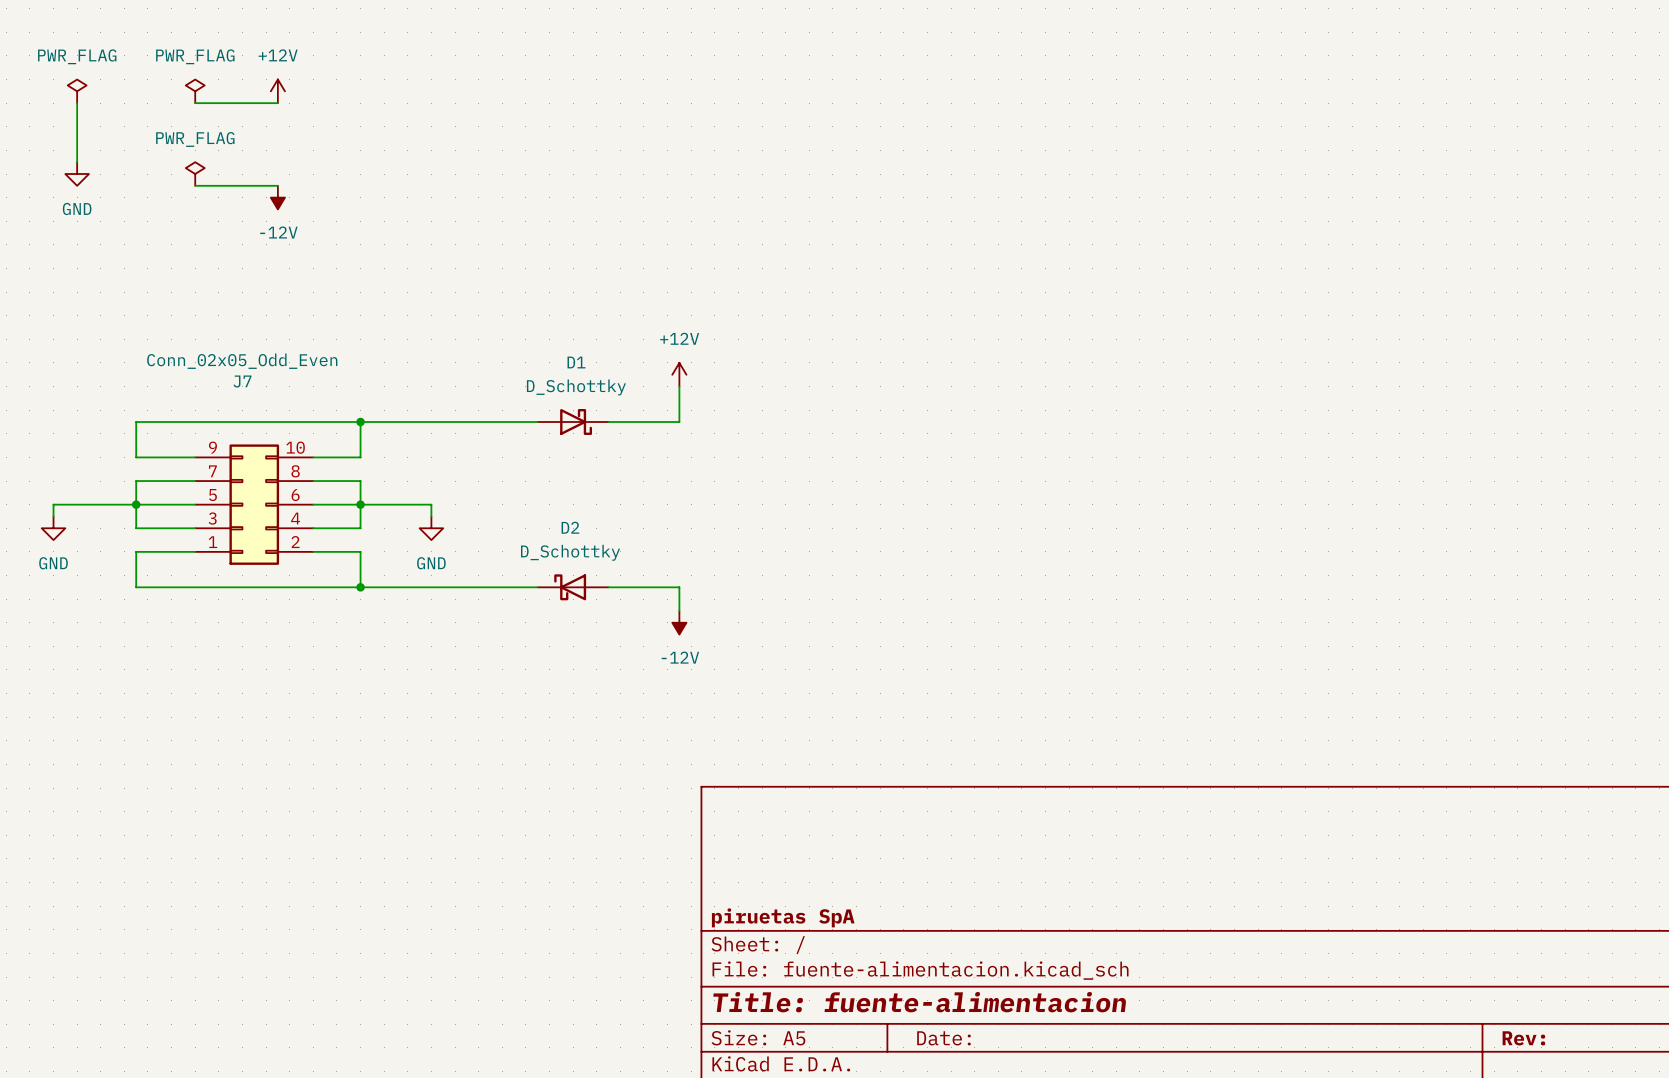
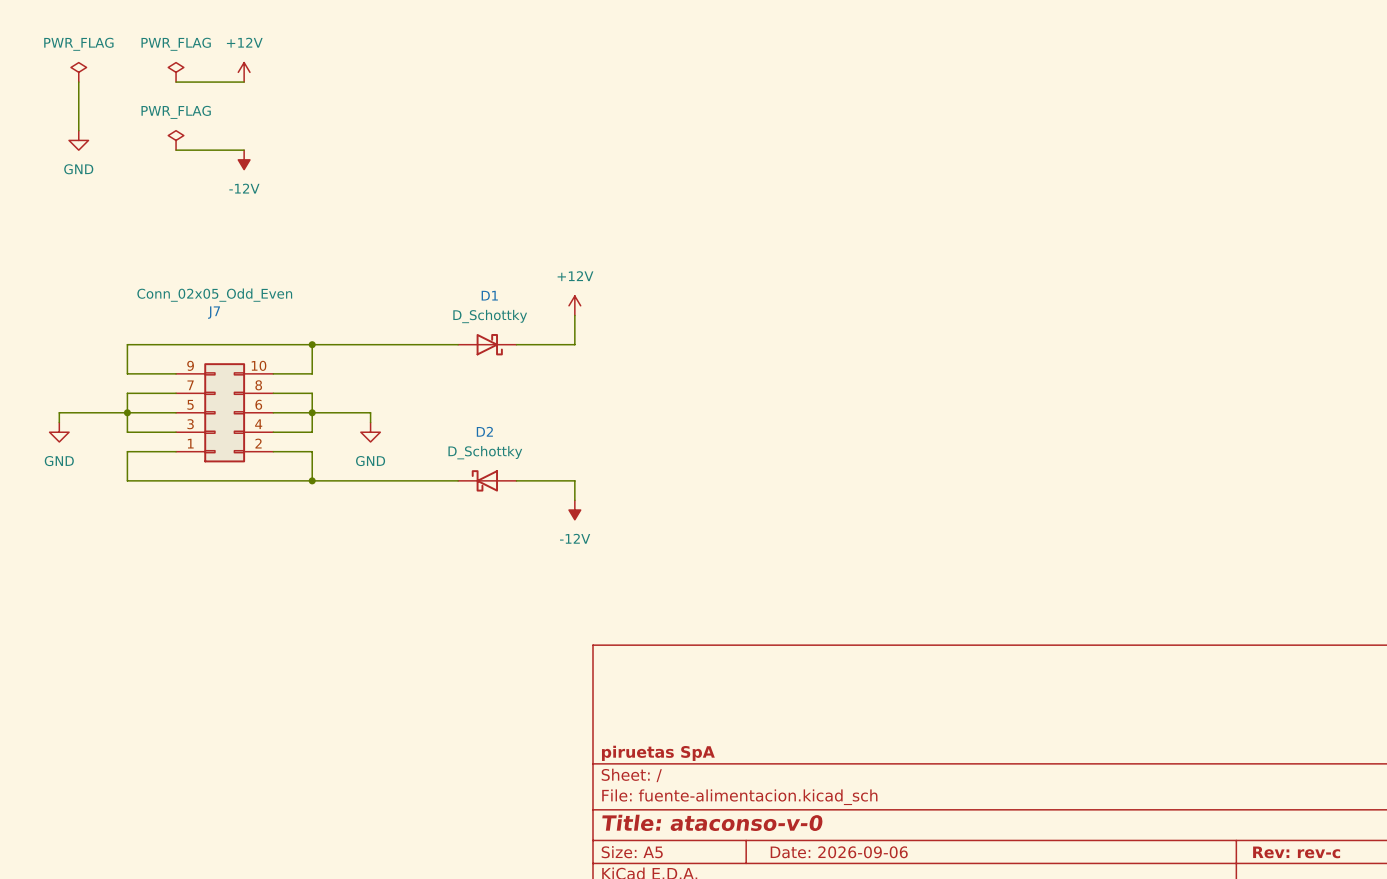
title block: Title: fuente-alimentacion (919, 1002) -> Title: ataconso-v-0 (712, 822)
title block: Date: (943, 1038) -> Date: 2026-09-06 (839, 852)
title block: Rev: (1523, 1038) -> Rev: rev-c (1296, 852)

